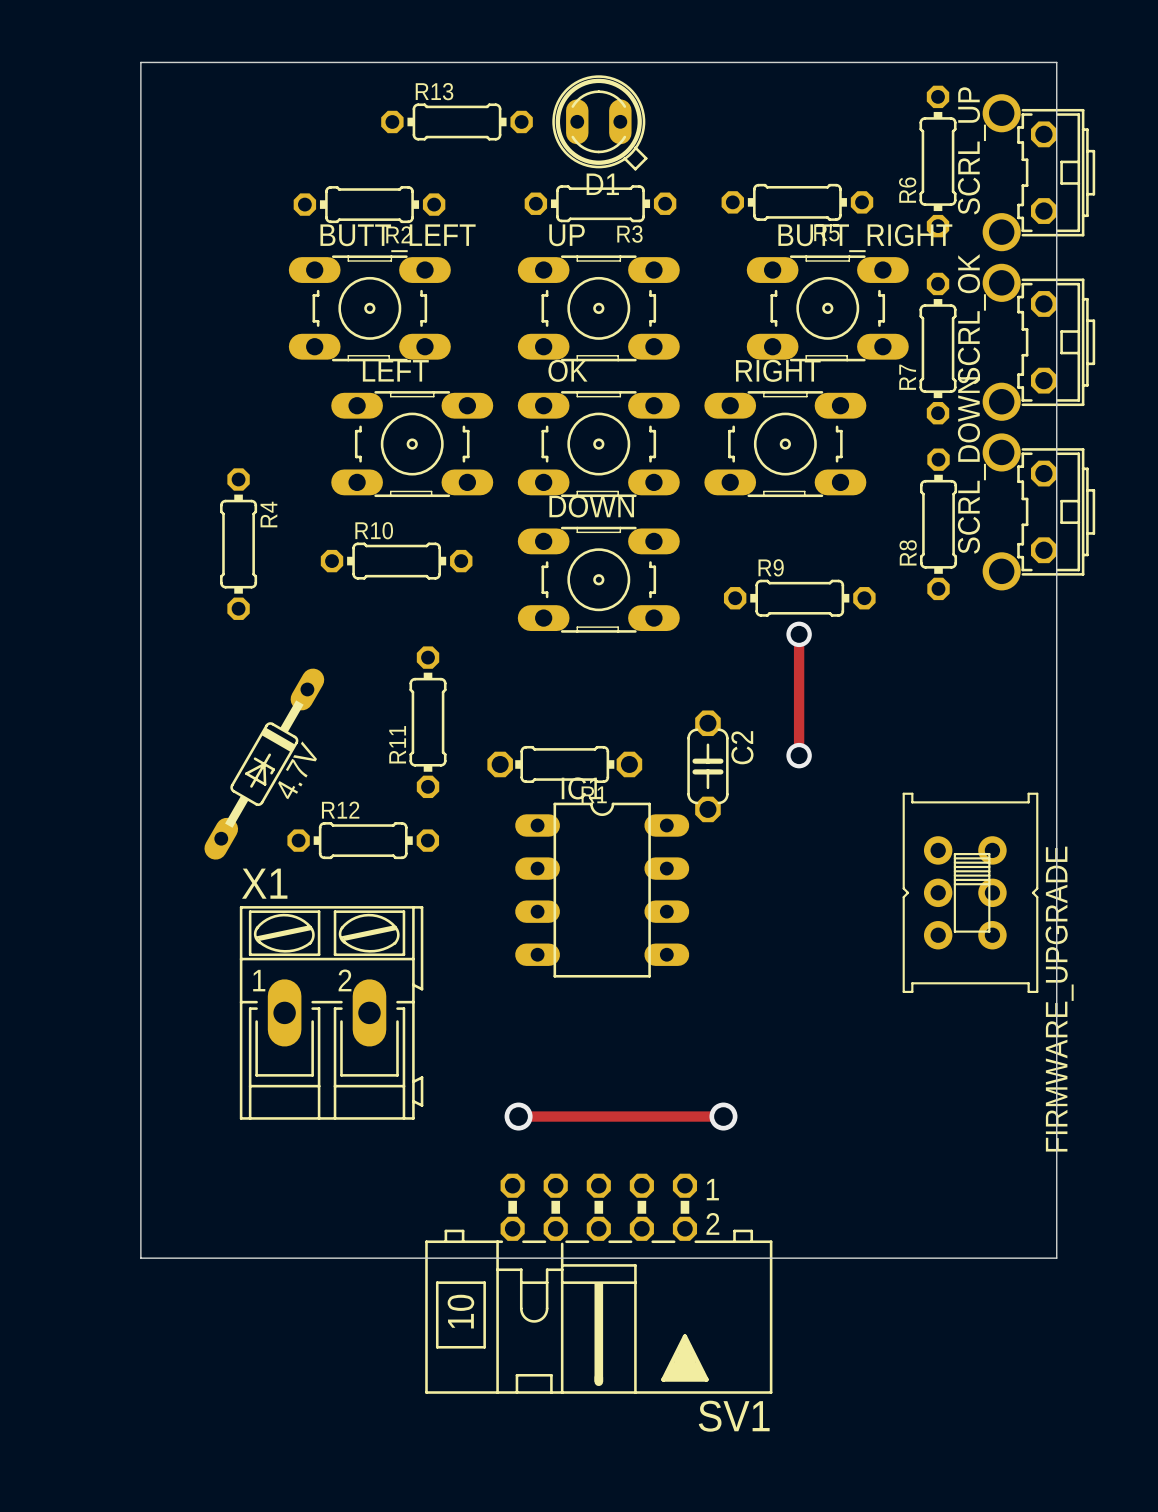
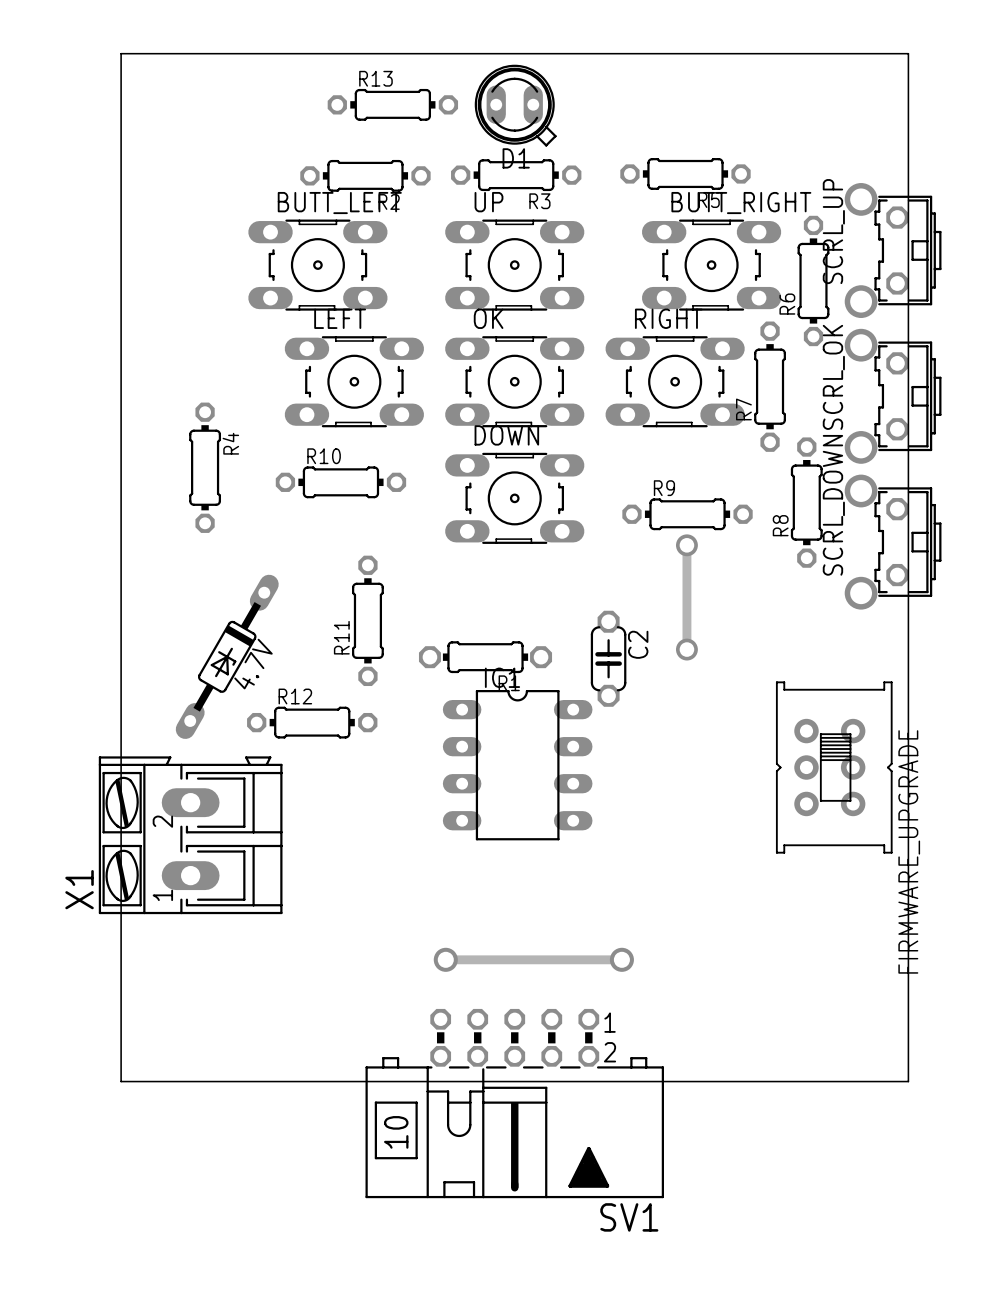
R6 position: (938, 161) -> (813, 280)
SCRL_UP position: (1038, 172) -> (893, 250)
R2 position: (369, 204) -> (365, 175)
SCRL_OK position: (1038, 342) -> (893, 396)
R7 position: (938, 348) -> (770, 386)
SCRL_DOWN position: (1038, 511) -> (893, 542)
R8 position: (938, 524) -> (806, 502)
X1 rotation: 0° (331, 1012) -> 90° counterclockwise (190, 835)

